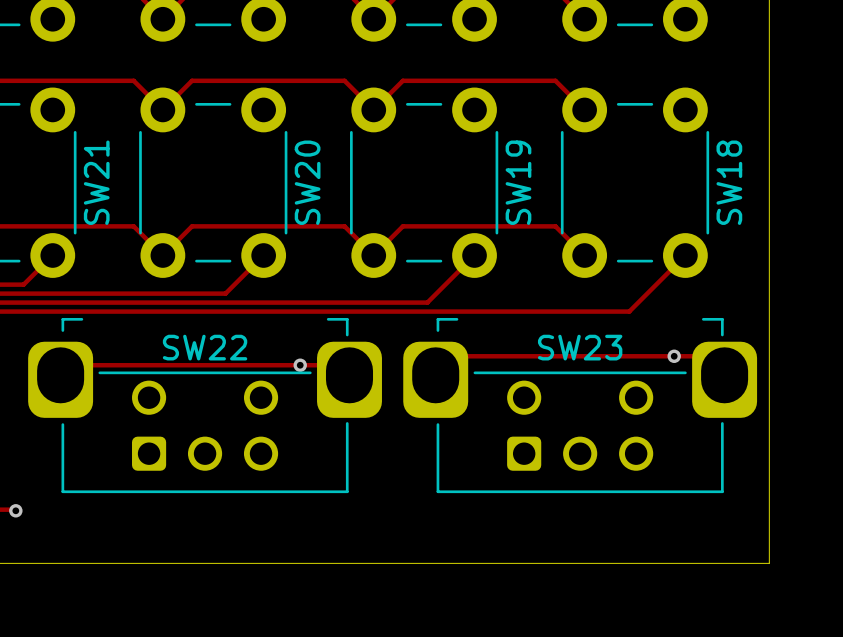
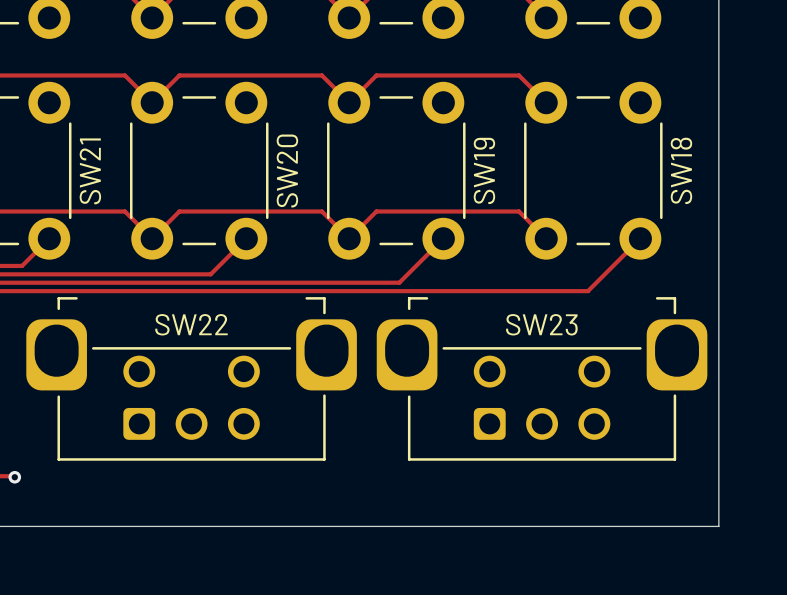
via: (674, 356) -> none
via: (300, 365) -> none
track: (60, 375) (70, 365) (338, 365) (349, 375) -> none
track: (435, 375) (454, 356) (705, 356) (724, 375) -> none

